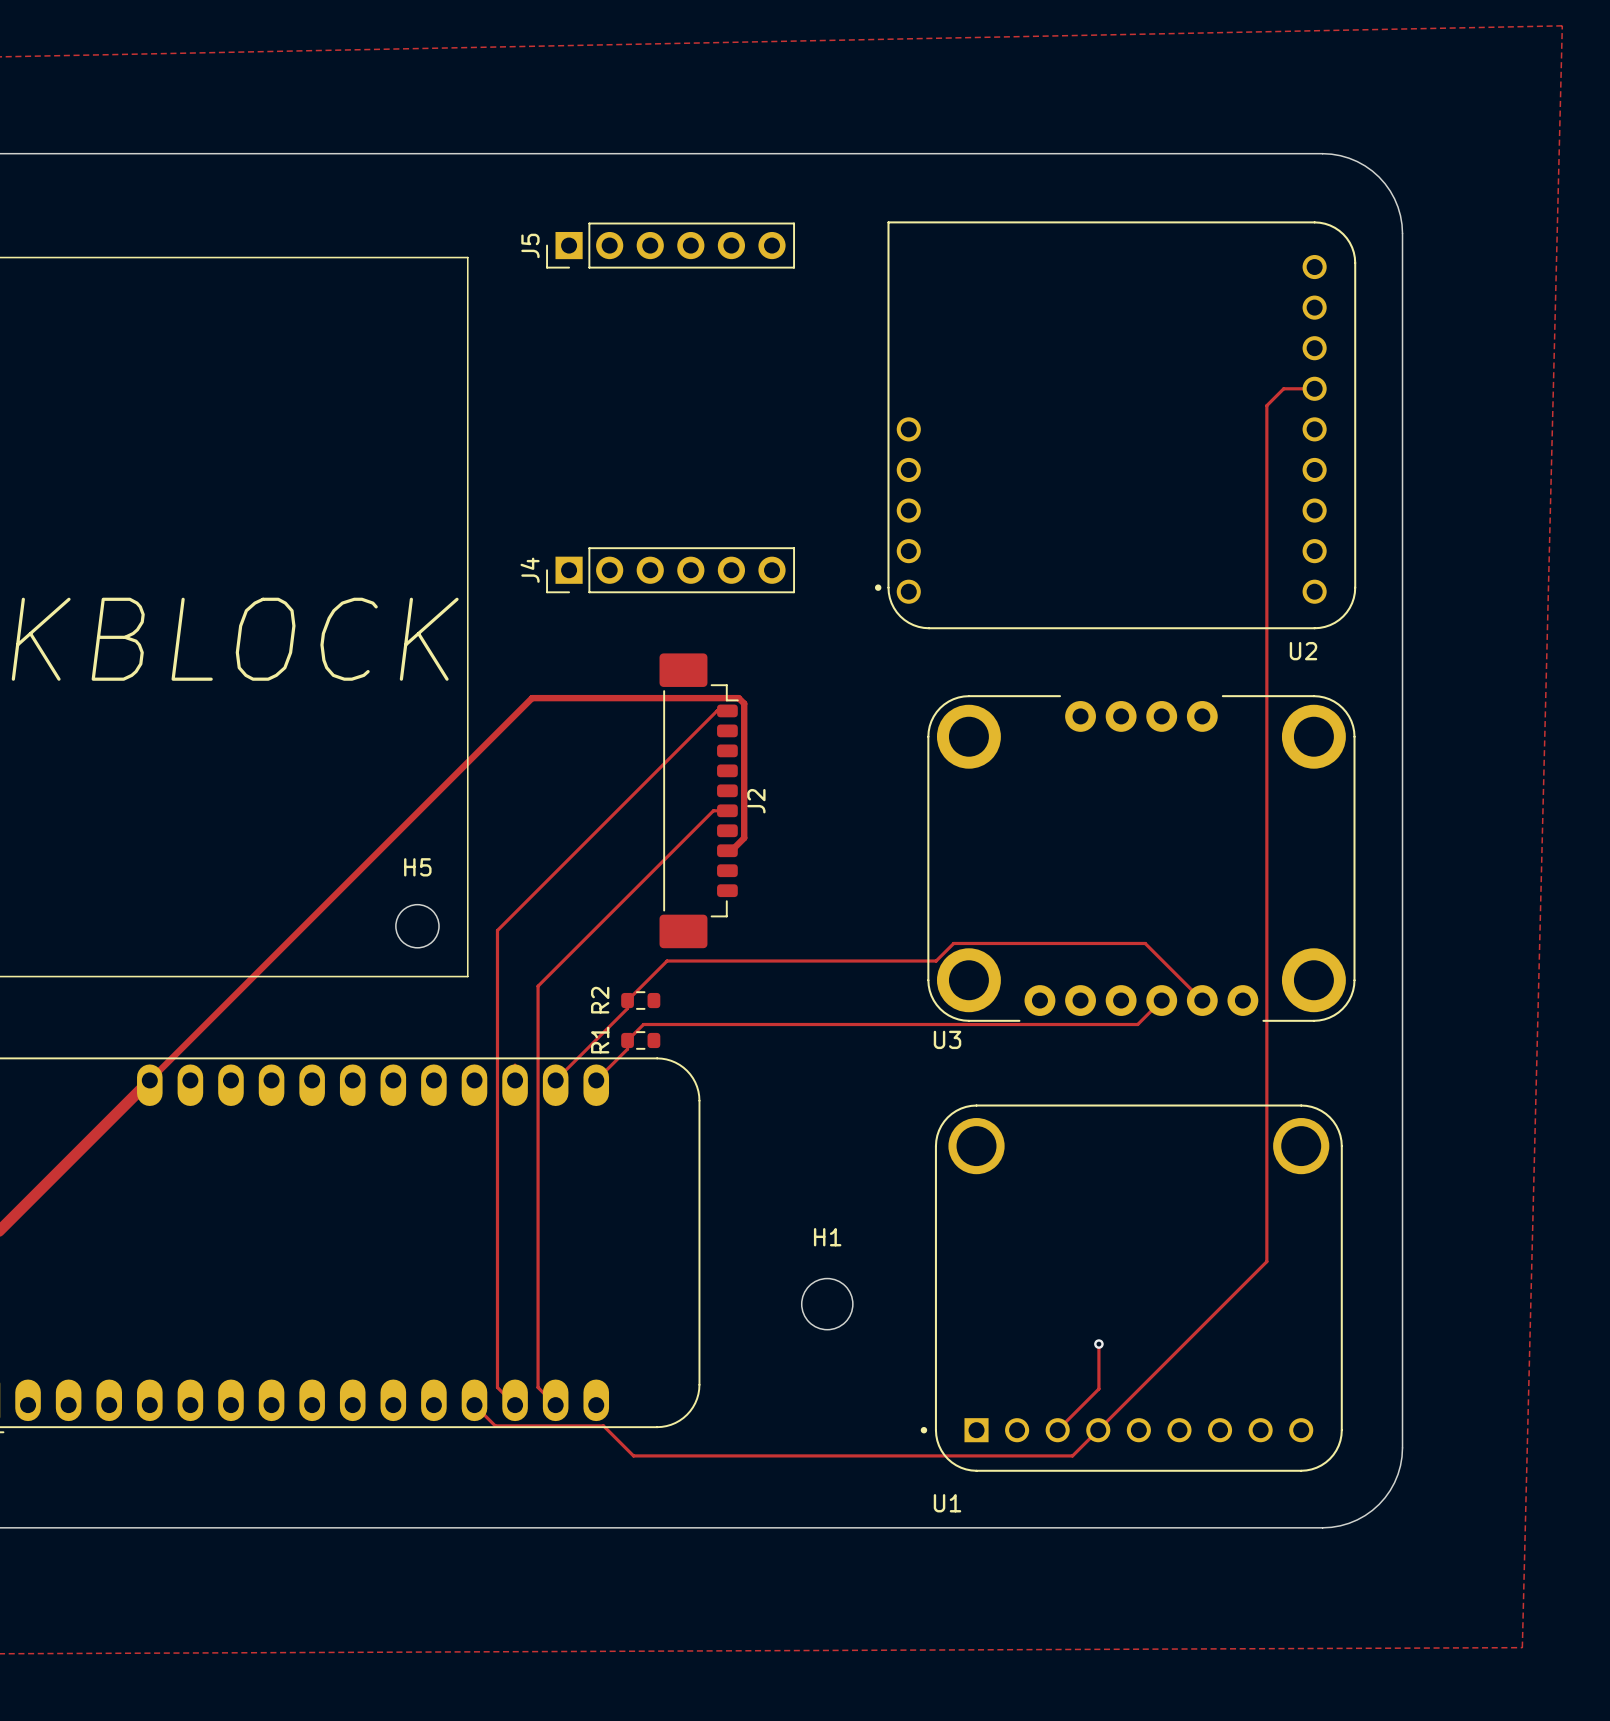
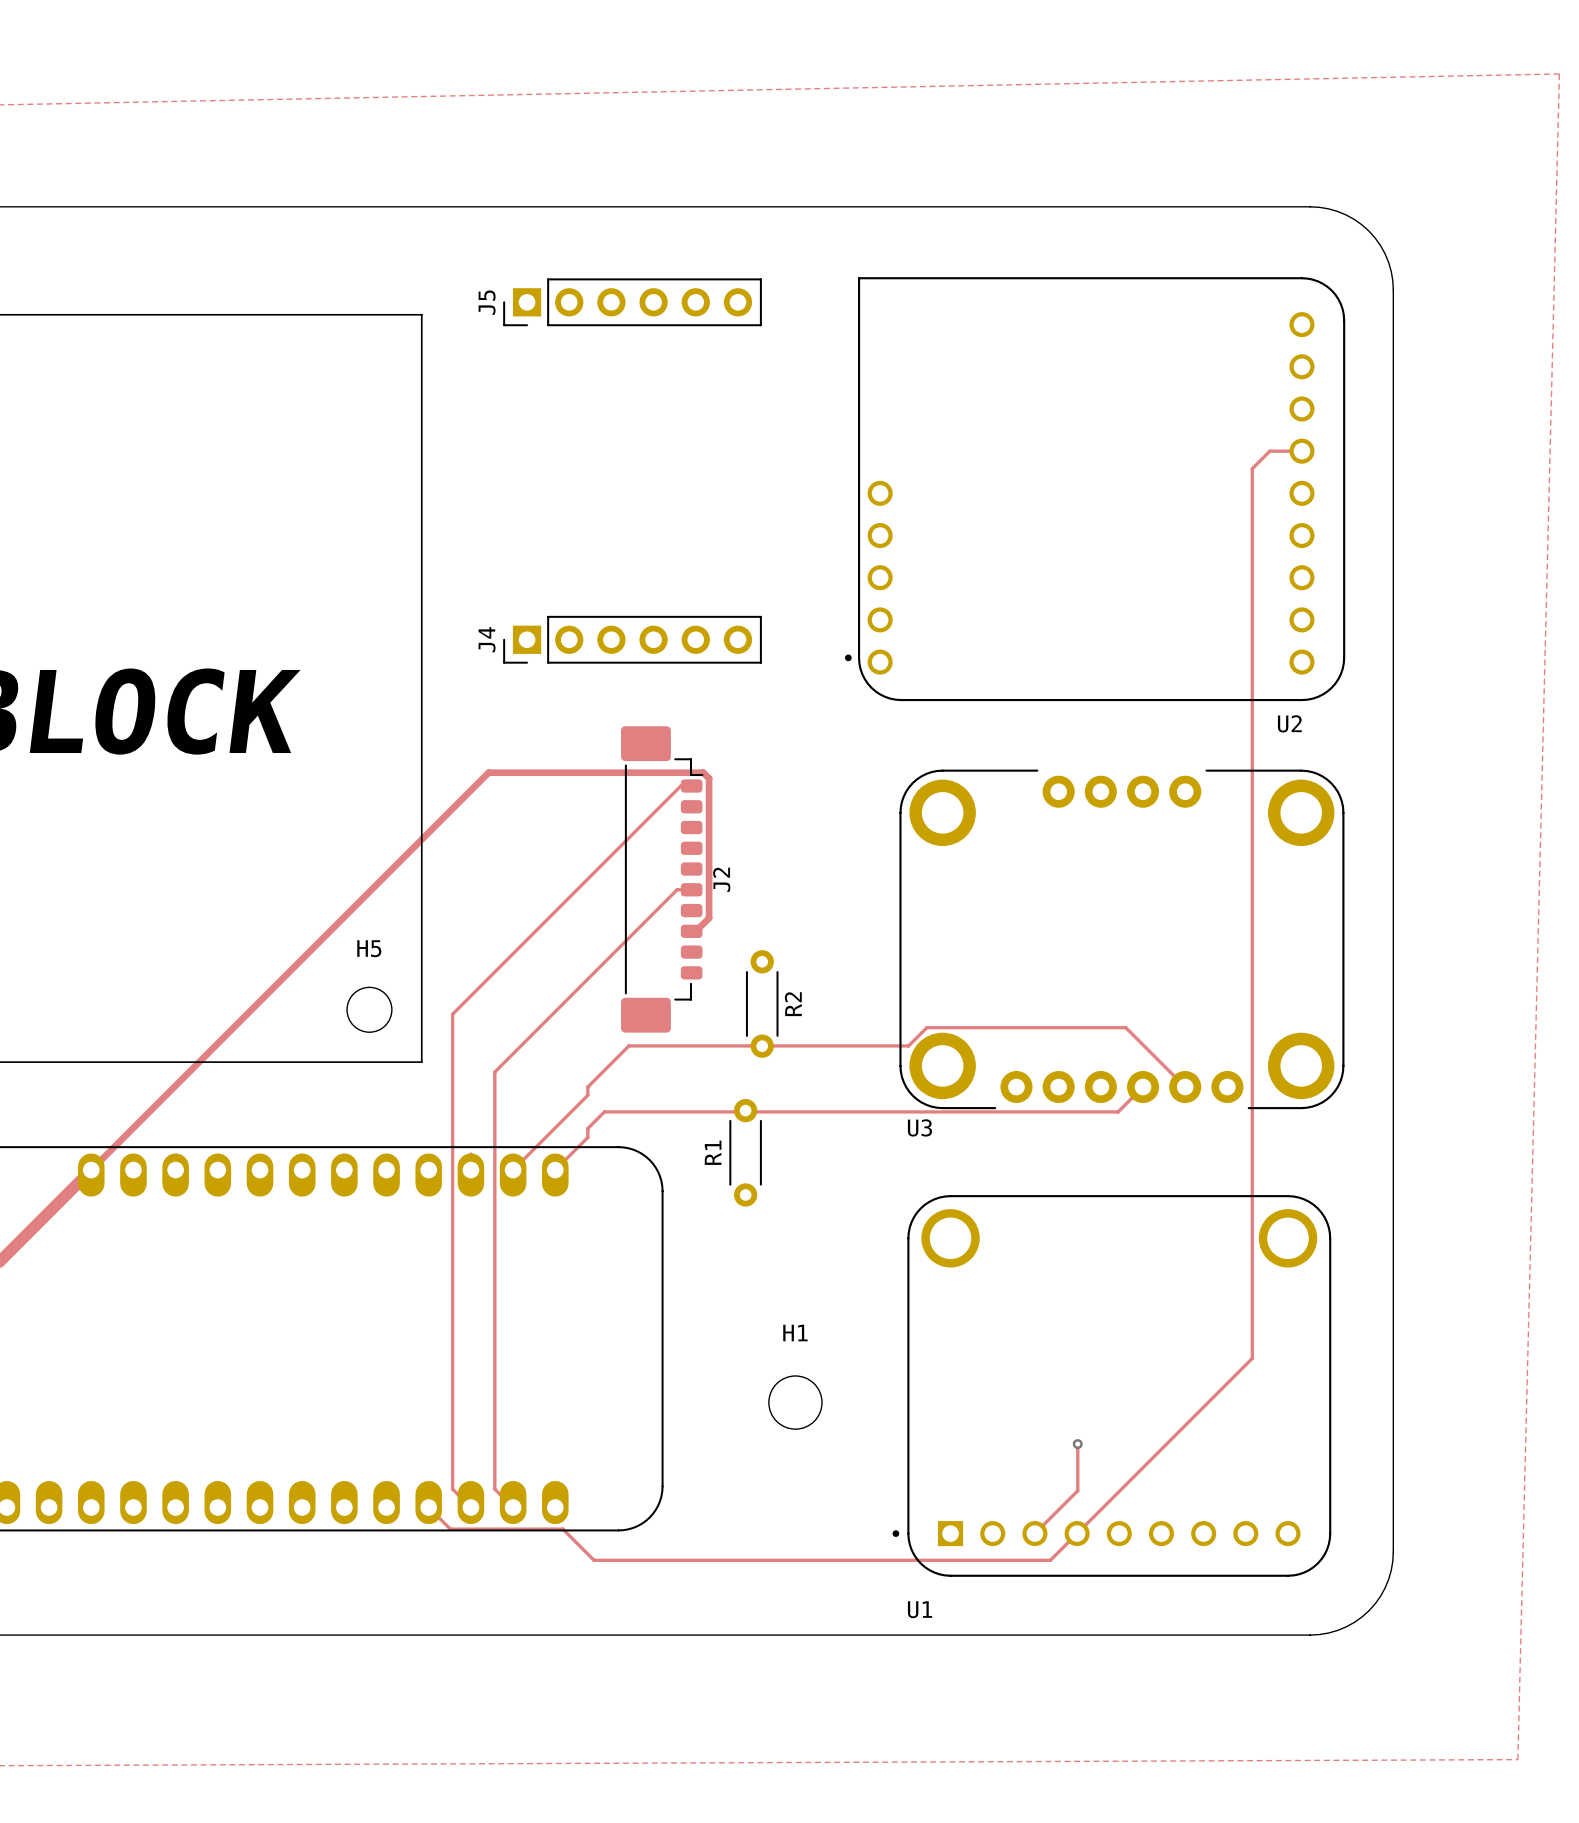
R2 footprint: [621, 991, 661, 1010] -> [745, 950, 779, 1058]
R2 name position: R2 (600, 1000) -> R2 (793, 1004)
R1 footprint: [621, 1031, 661, 1050] -> [729, 1098, 762, 1207]

